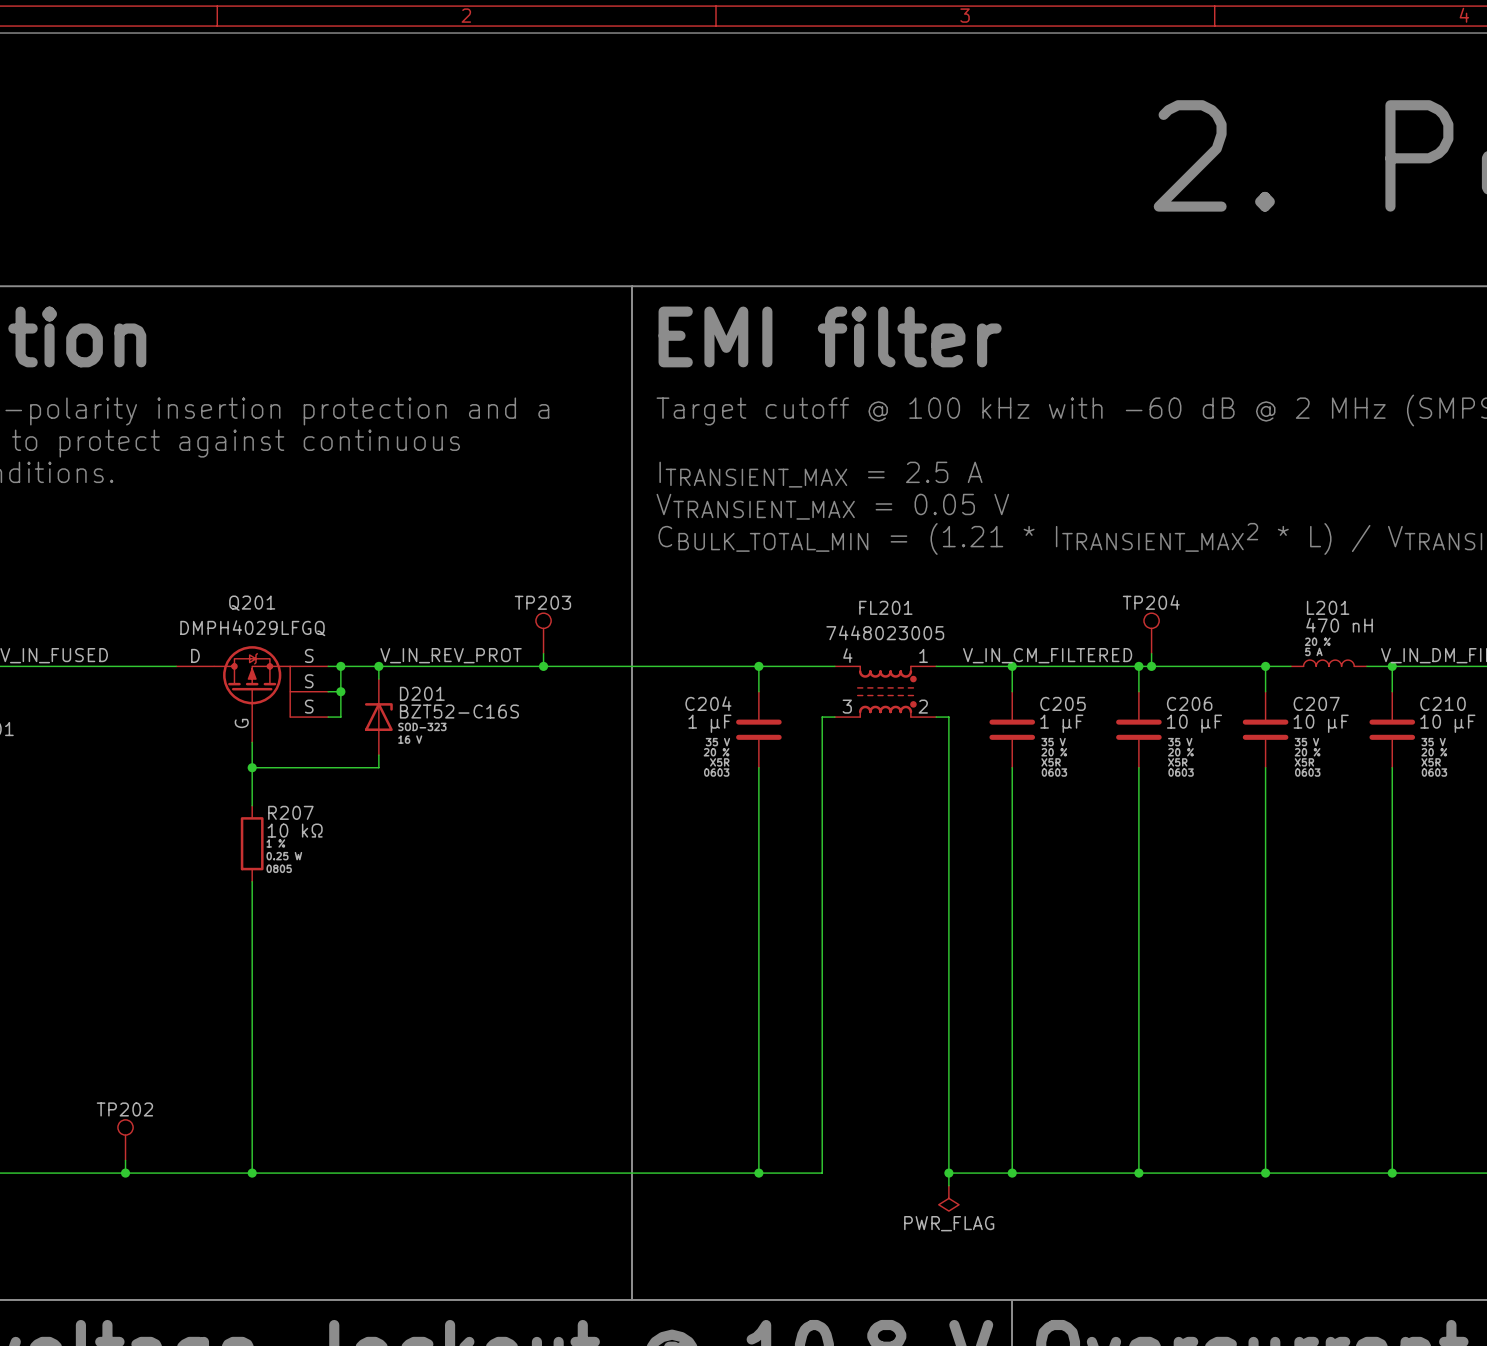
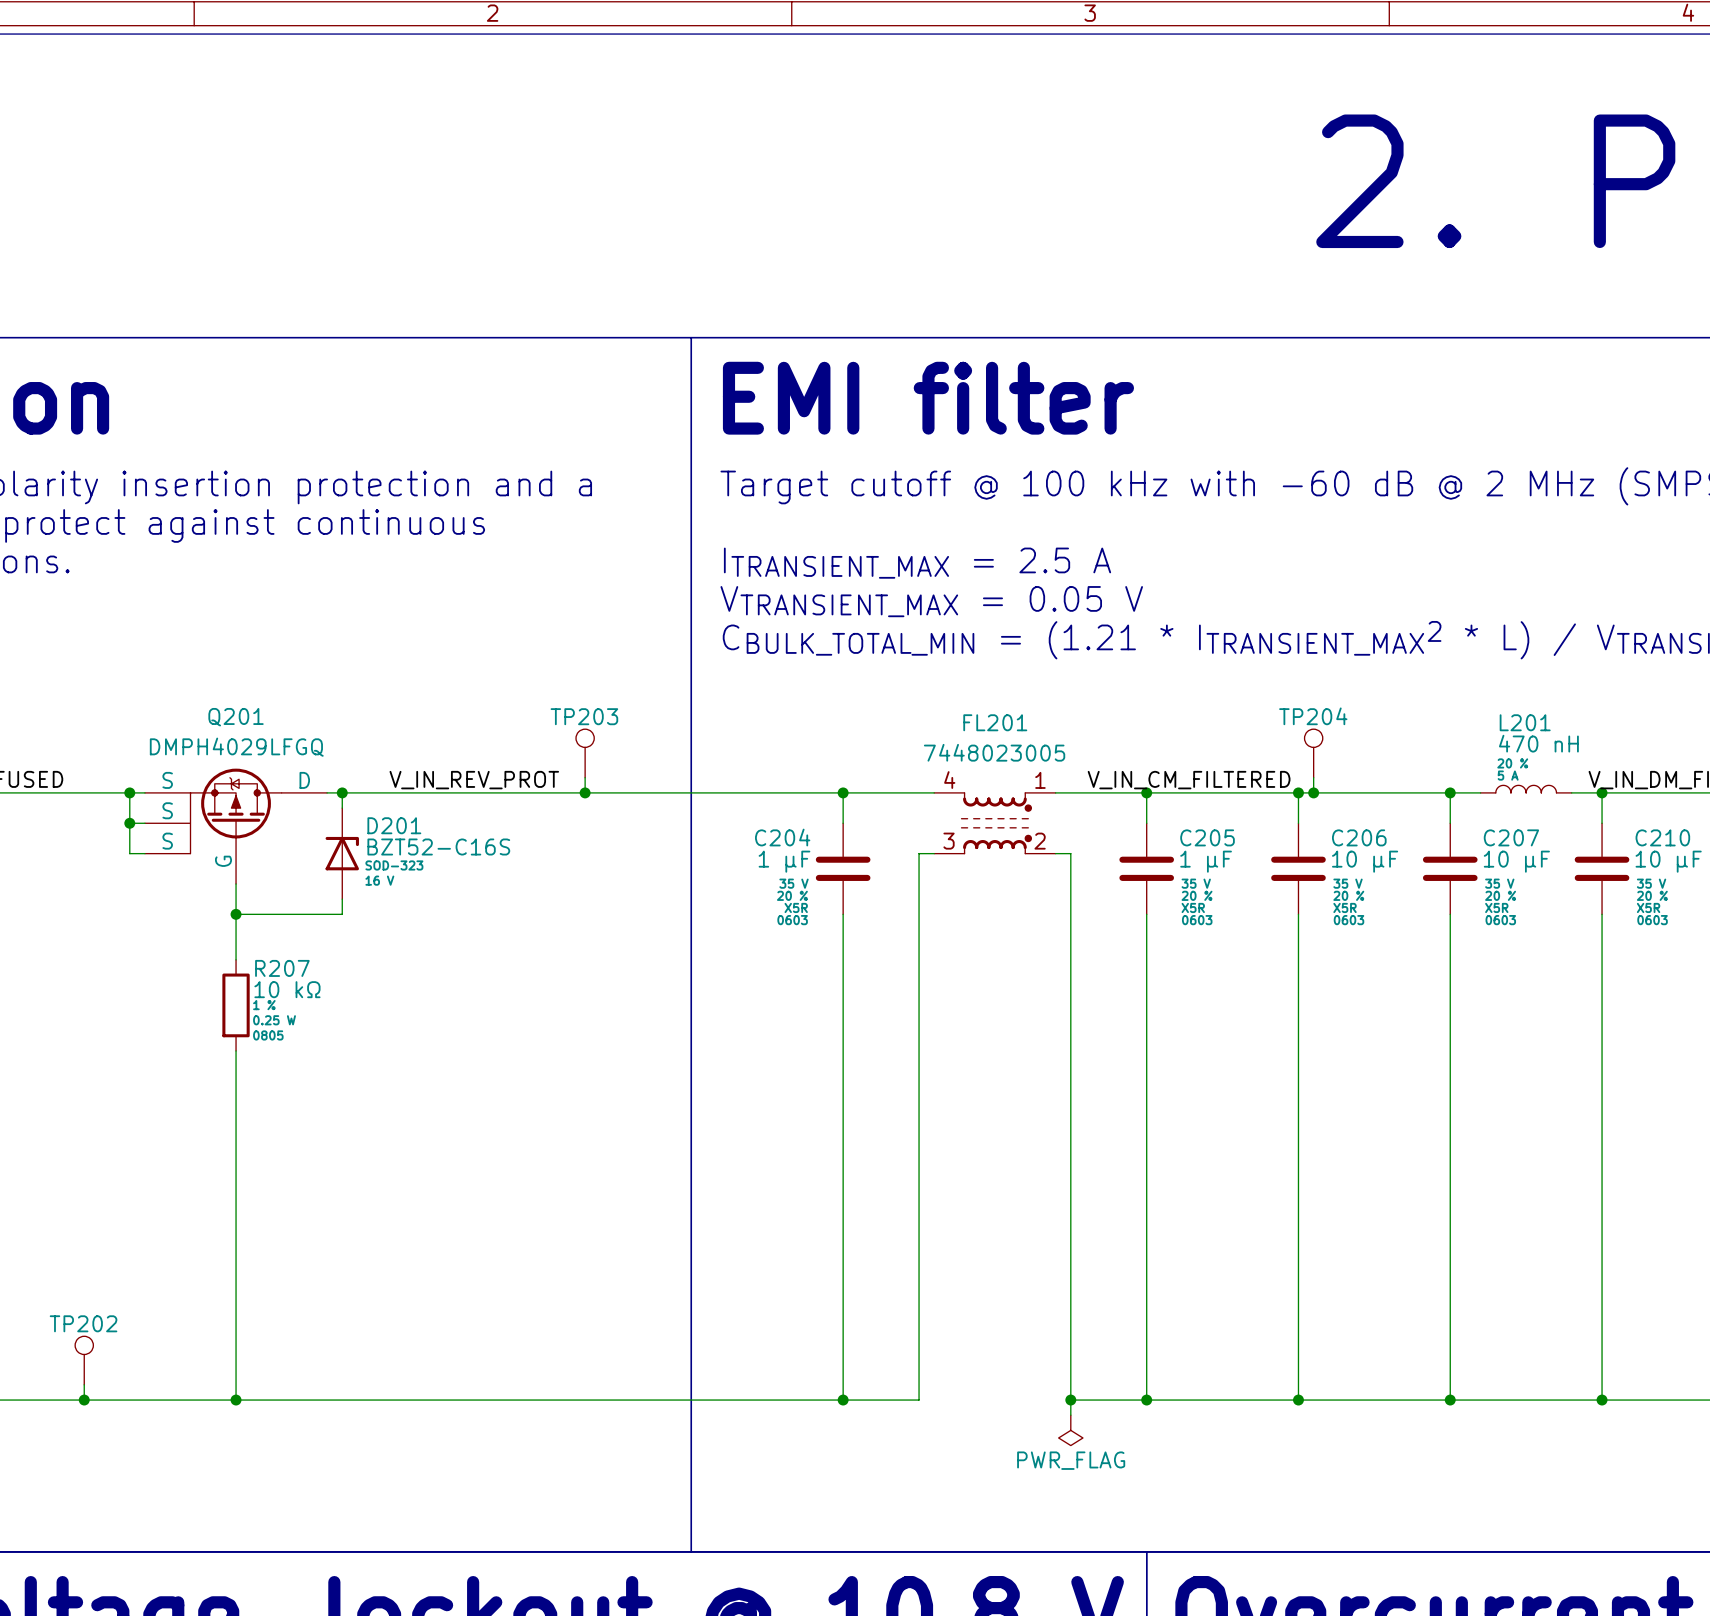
wire: none -> (129, 792) (129, 853) (144, 853)
junction: none -> (129, 792)
wire: (378, 666) (378, 679) -> none
junction: (378, 666) -> none
Q201 flip: as is (252, 681) -> left-right (236, 811)
junction: none -> (129, 823)
wire: (328, 691) (340, 691) -> (129, 823) (144, 823)
junction: (340, 691) -> none
D201 position: (378, 717) -> (342, 853)
wire: (378, 755) (378, 767) (340, 767) -> (342, 899) (342, 914)

